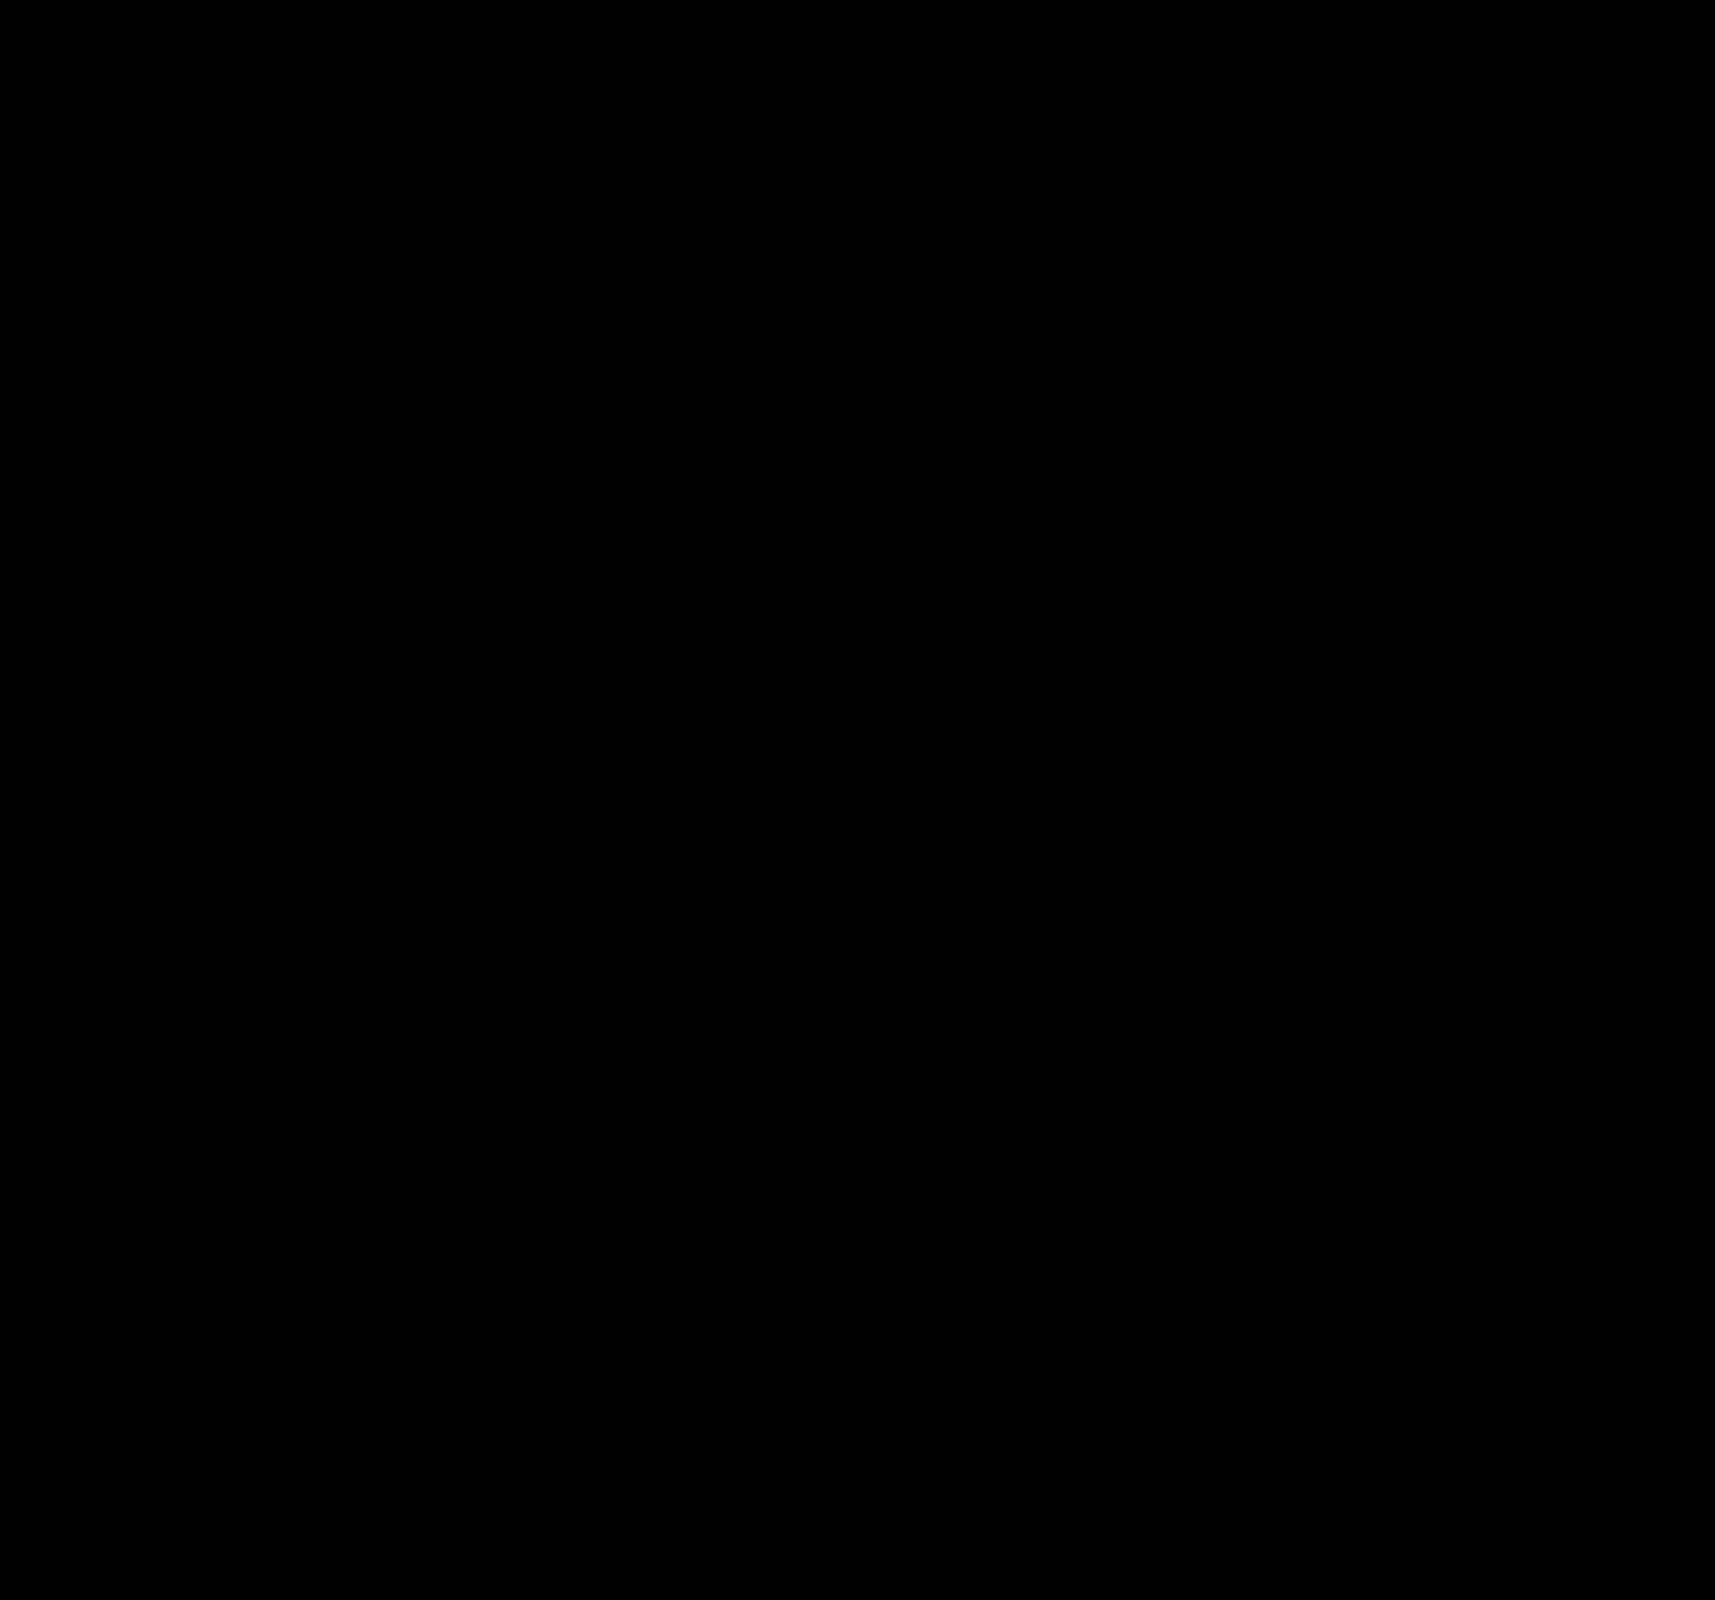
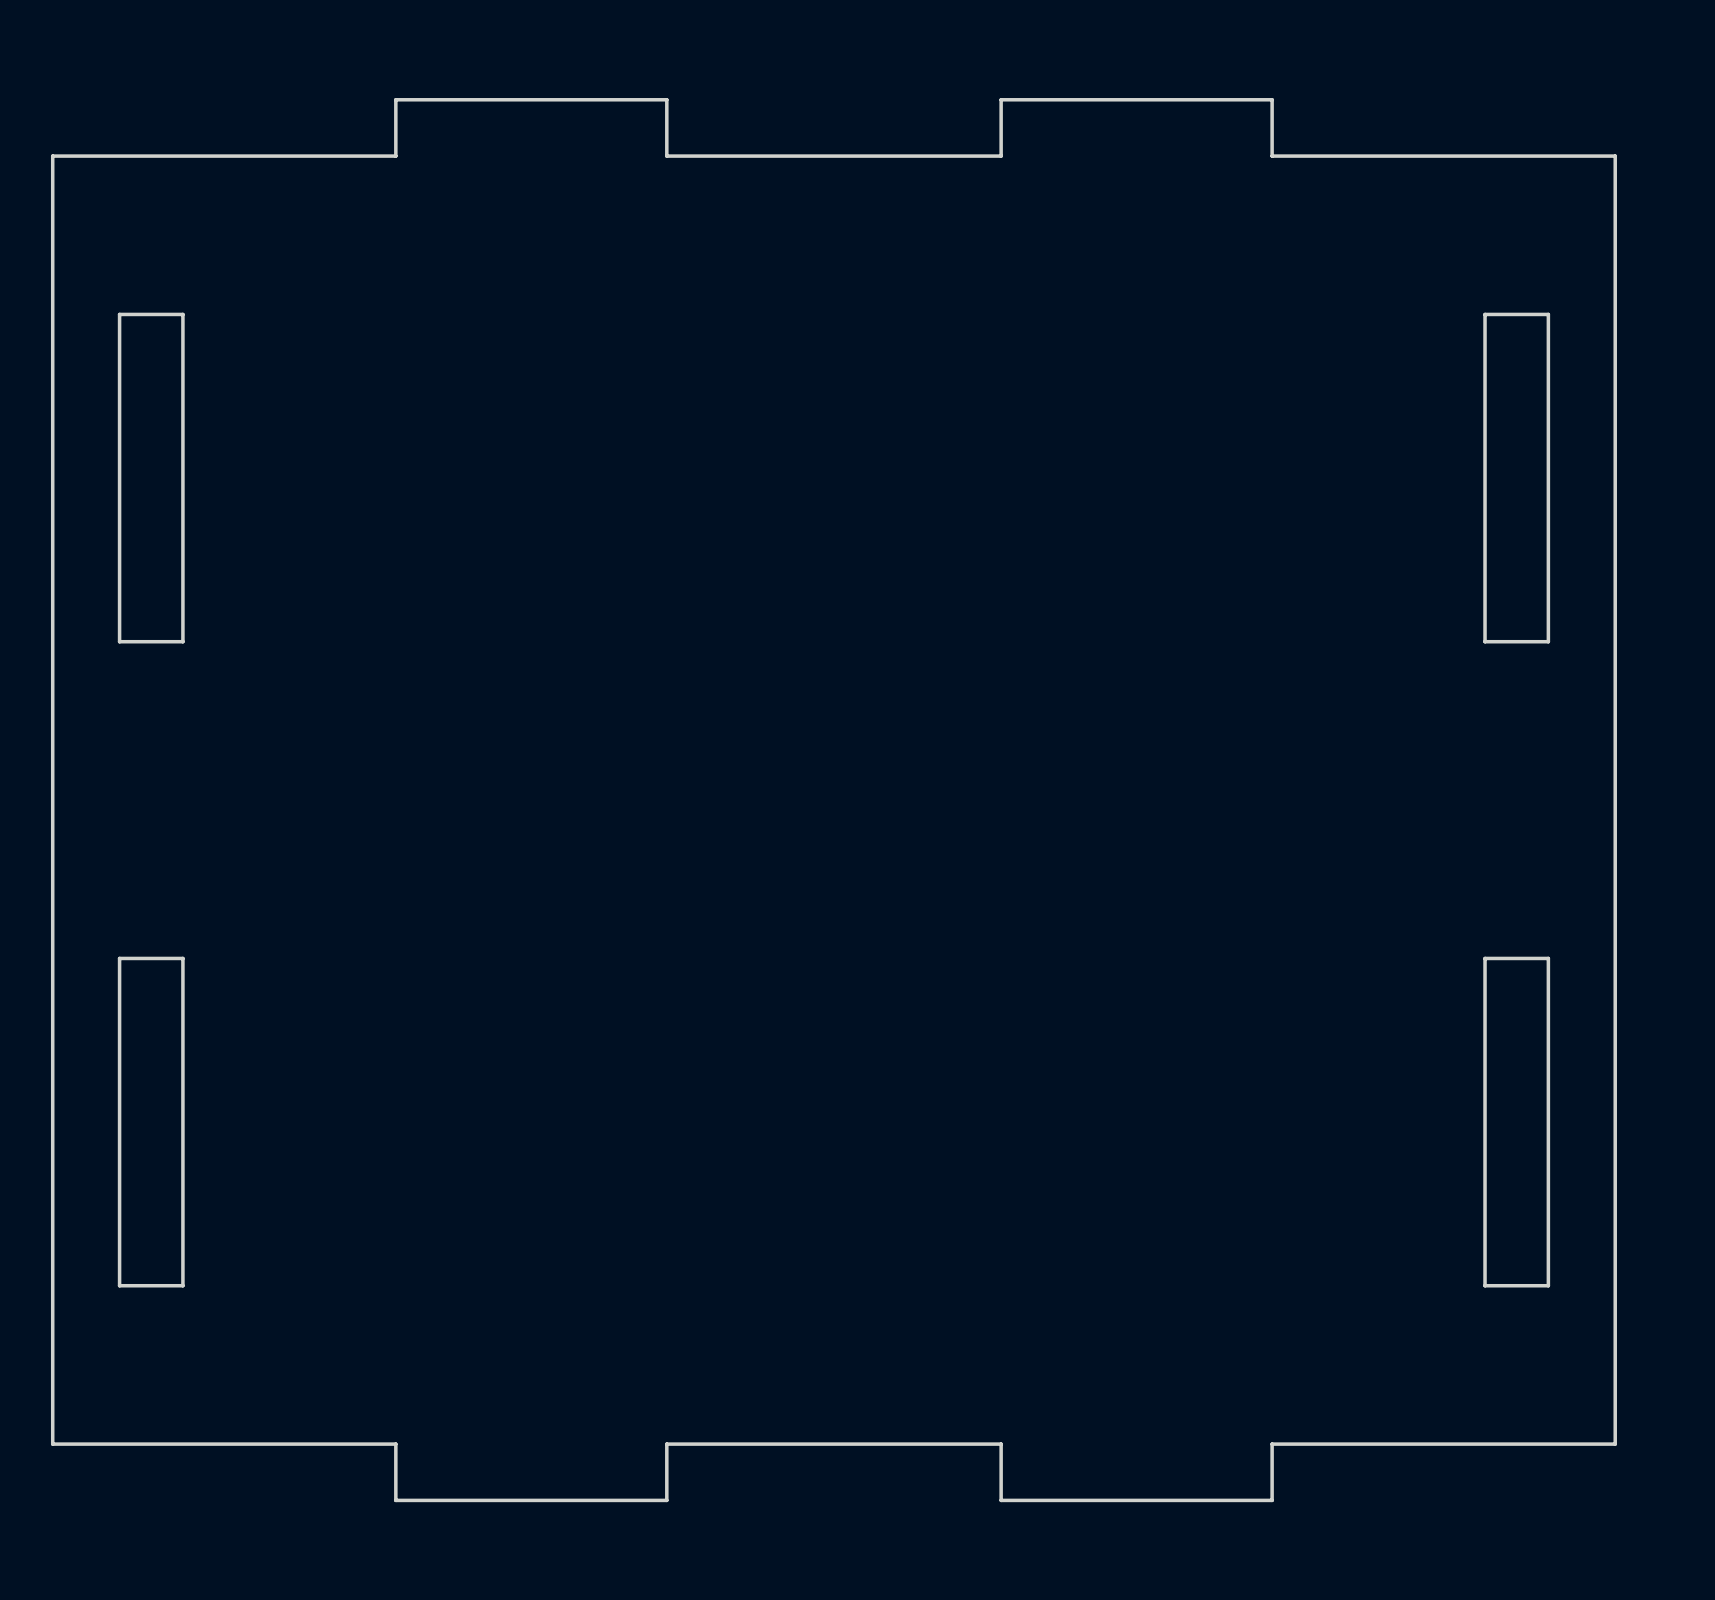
board edge: none -> (395, 99) (395, 156) (52, 156) (52, 1444) (395, 1444) (395, 1500) (666, 1500) (666, 1444) (1001, 1444) (1001, 1500) (1272, 1500) (1272, 1444) (1615, 1444) (1615, 156) (1272, 156) (1272, 99) (1001, 99) (1001, 156) (666, 156) (666, 99) (395, 99)
board edge: none -> (119, 314) (182, 314) (182, 641) (119, 641) (119, 314)
board edge: none -> (1485, 314) (1548, 314) (1548, 641) (1485, 641) (1485, 314)
board edge: none -> (119, 958) (119, 1285) (182, 1285) (182, 958) (119, 958)
board edge: none -> (1485, 958) (1548, 958) (1548, 1285) (1485, 1285) (1485, 958)

